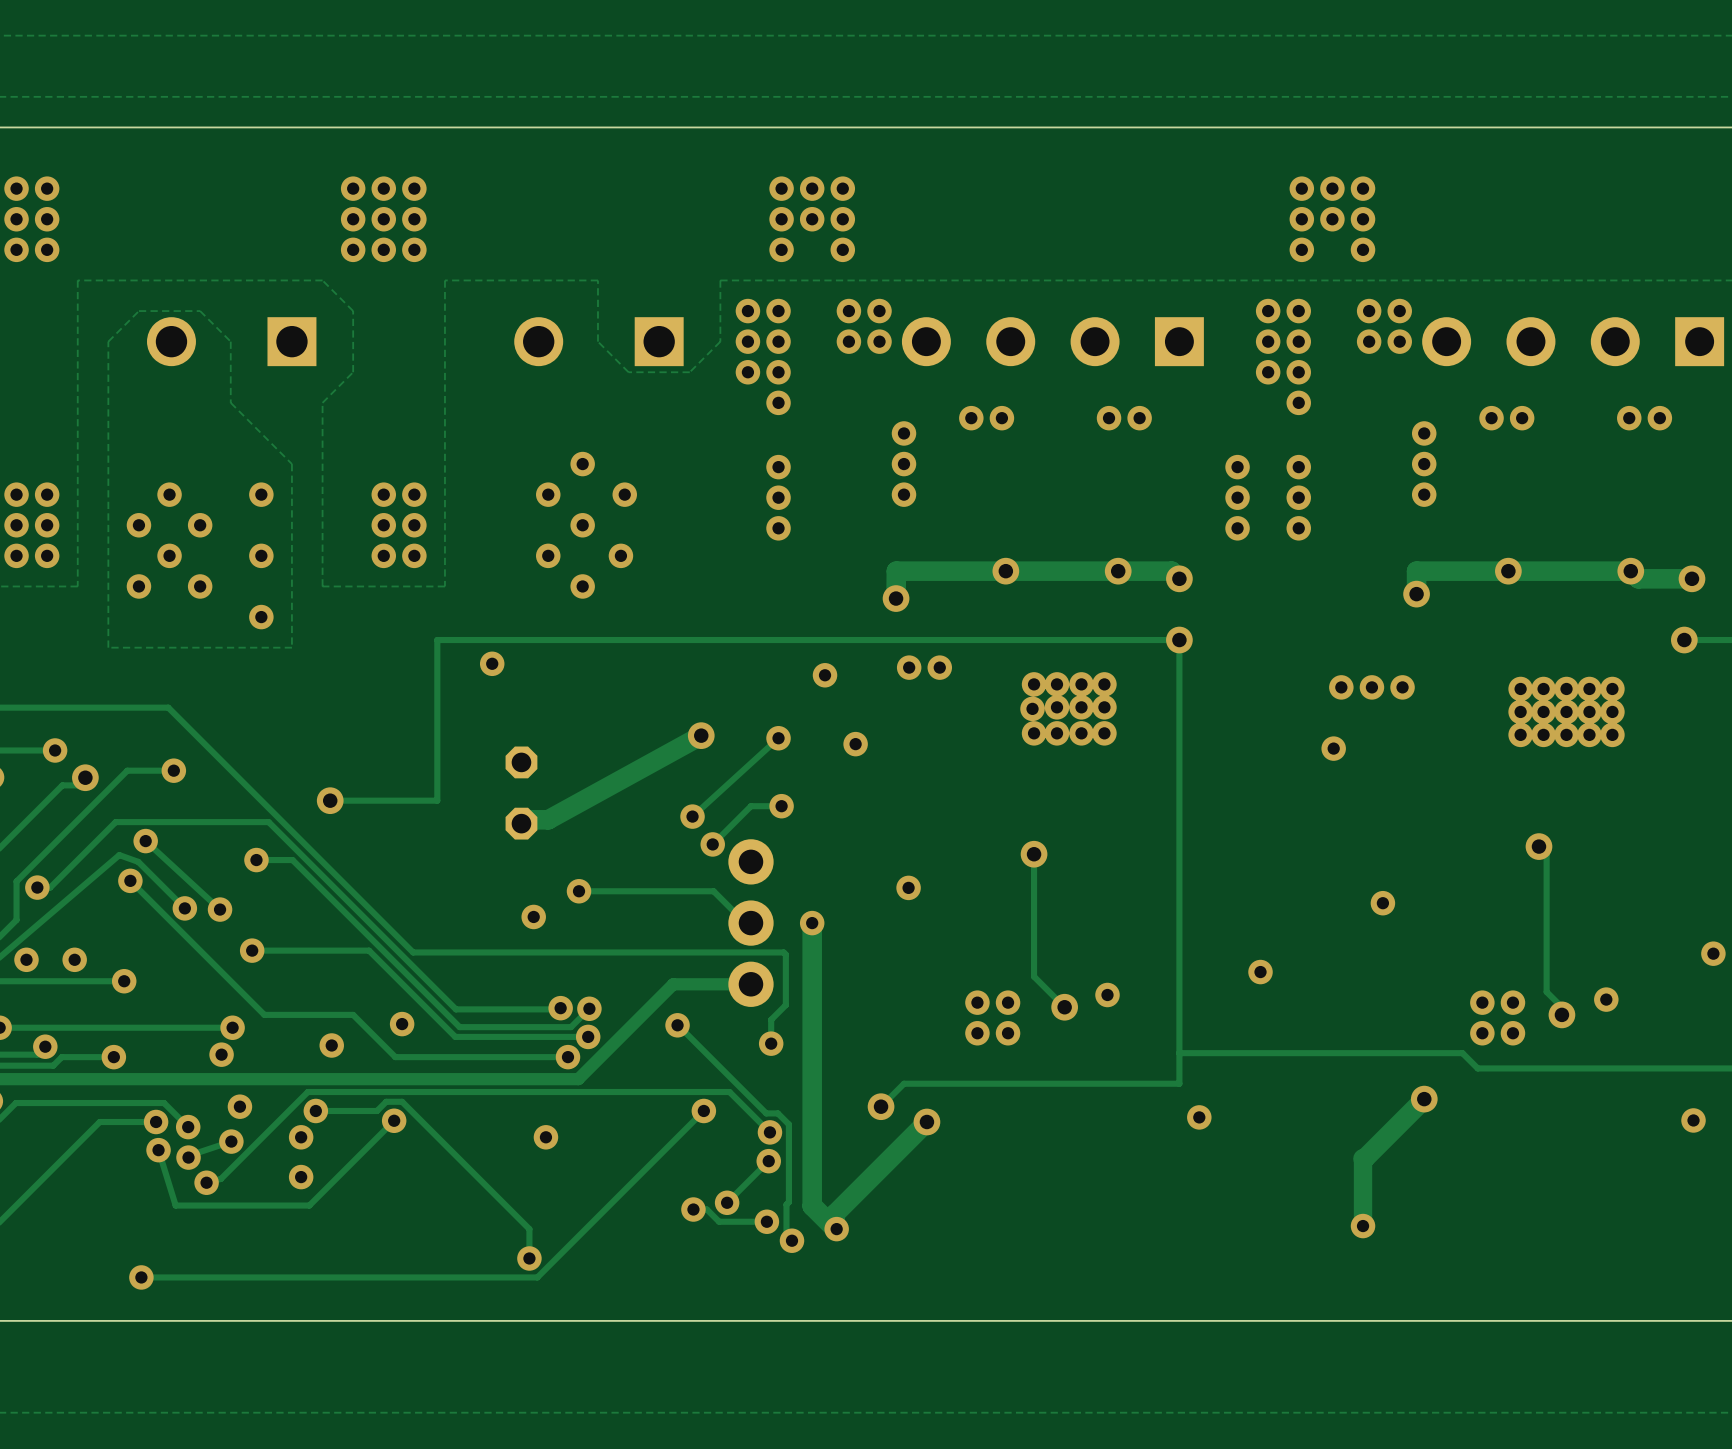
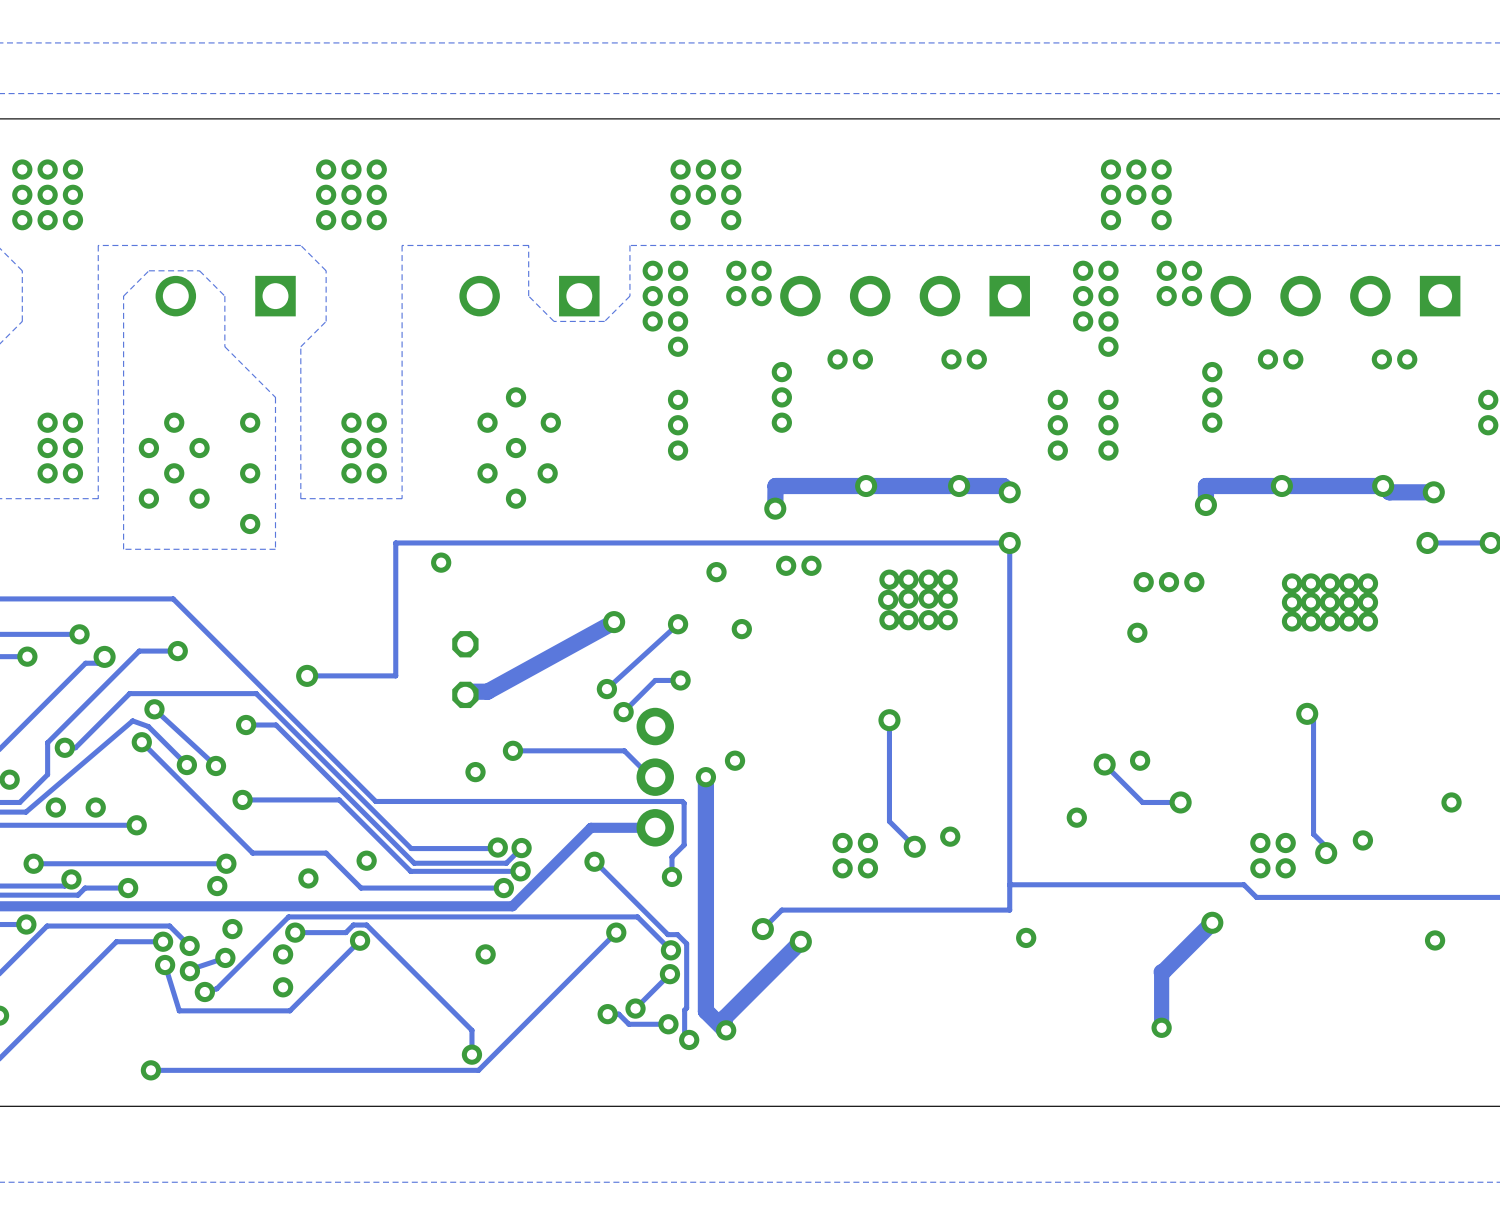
via position: (908, 887) -> (735, 760)
via position: (1382, 903) -> (1140, 760)
track: none -> (1104, 764) (1142, 802) (1180, 802)
via: none -> (1104, 764)
via: none -> (1180, 802)

